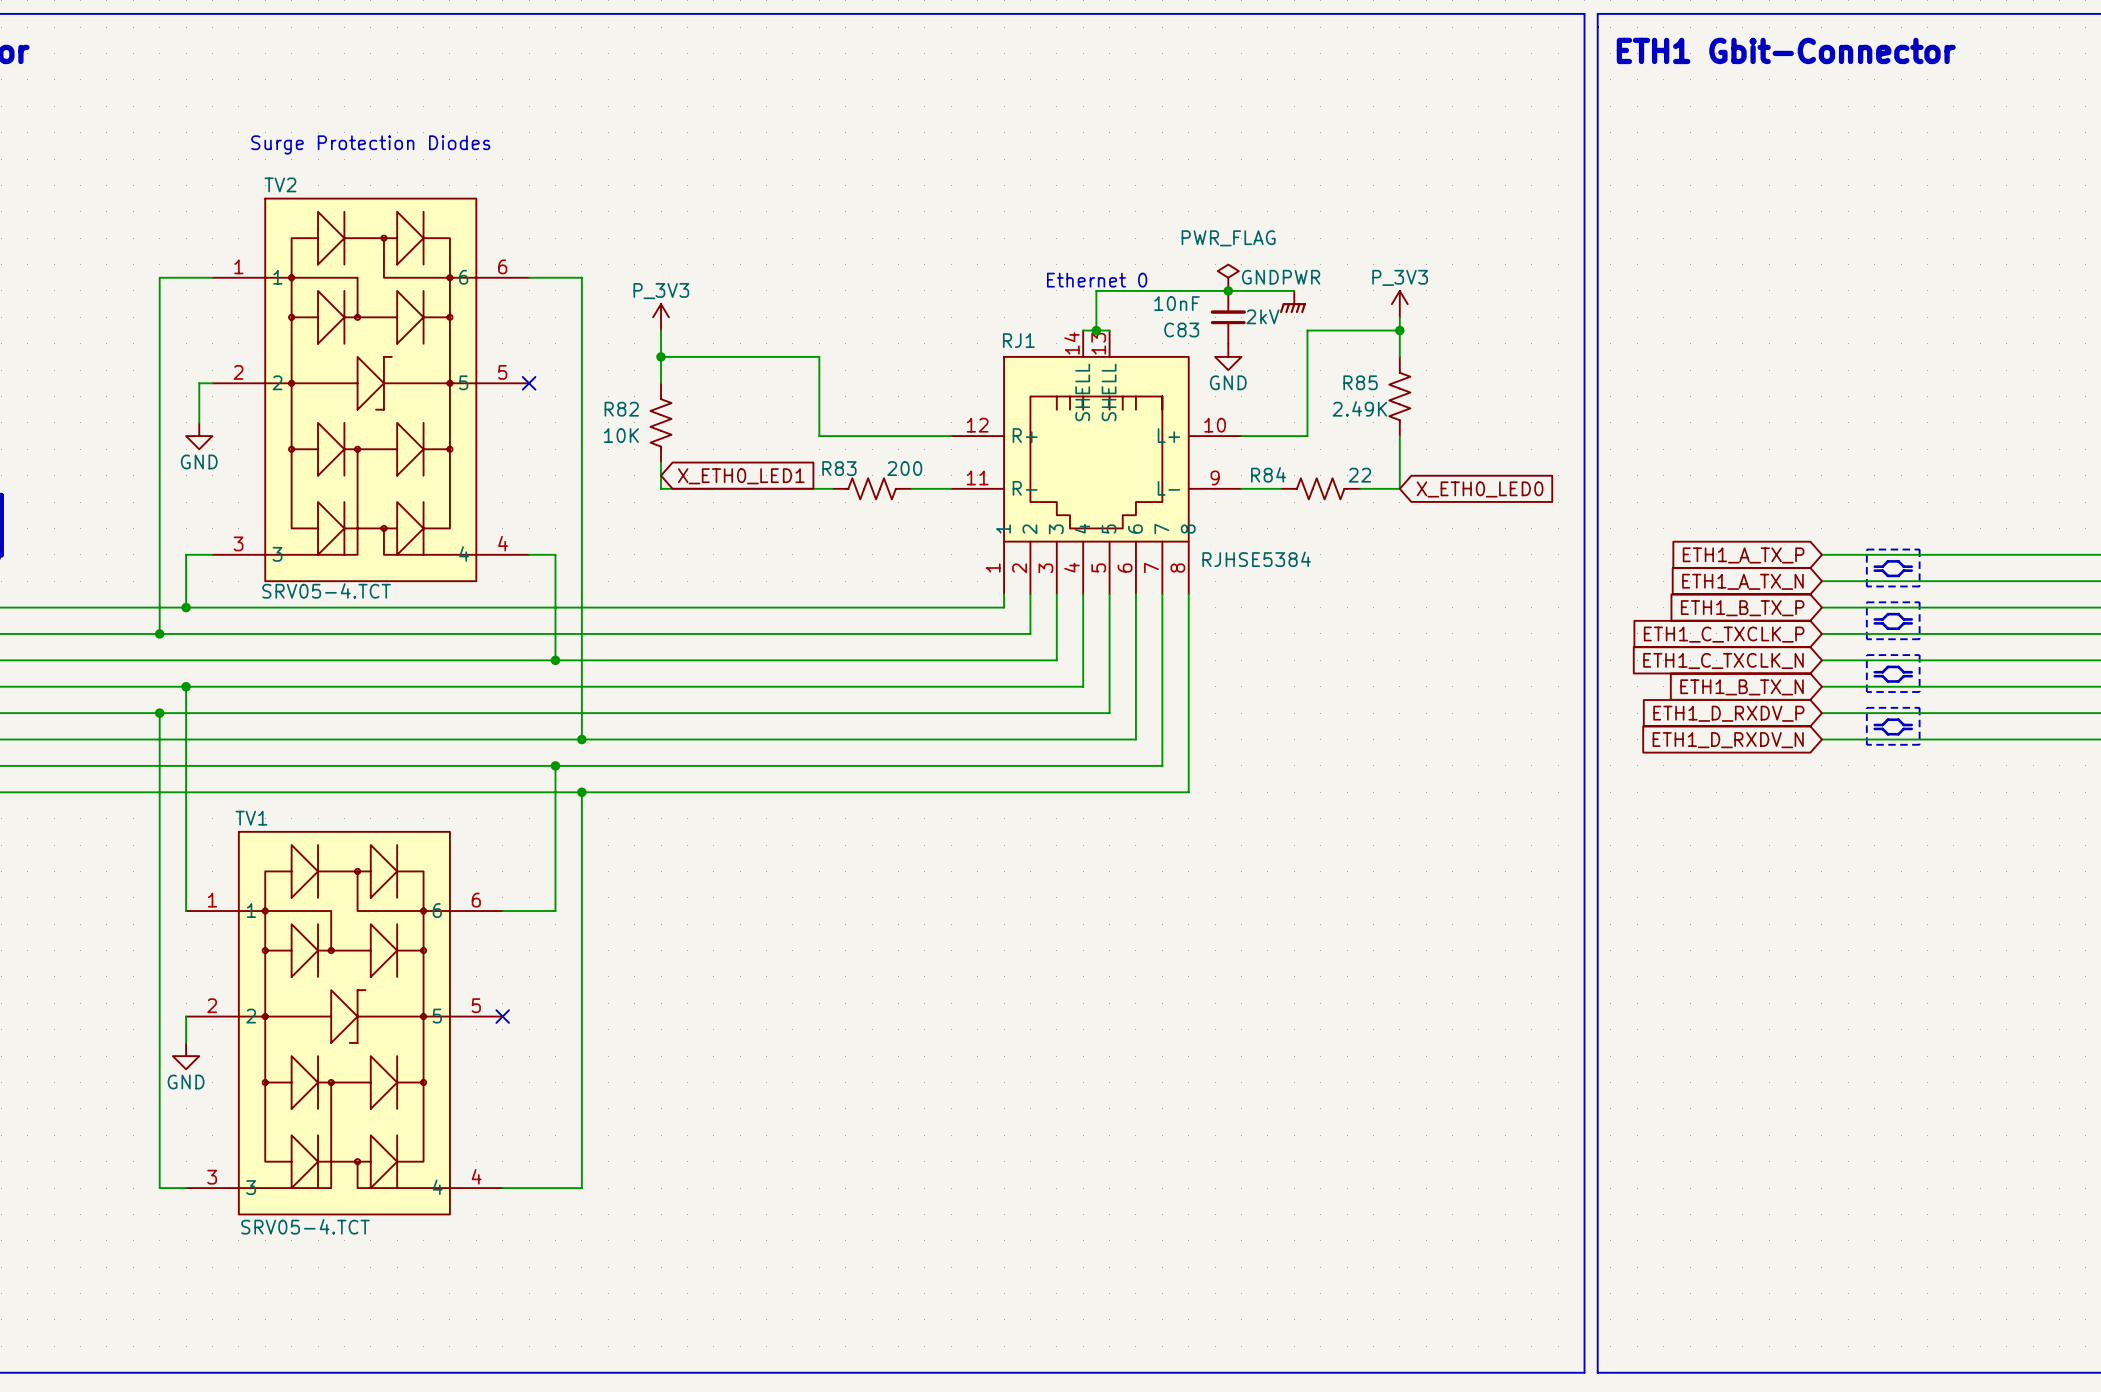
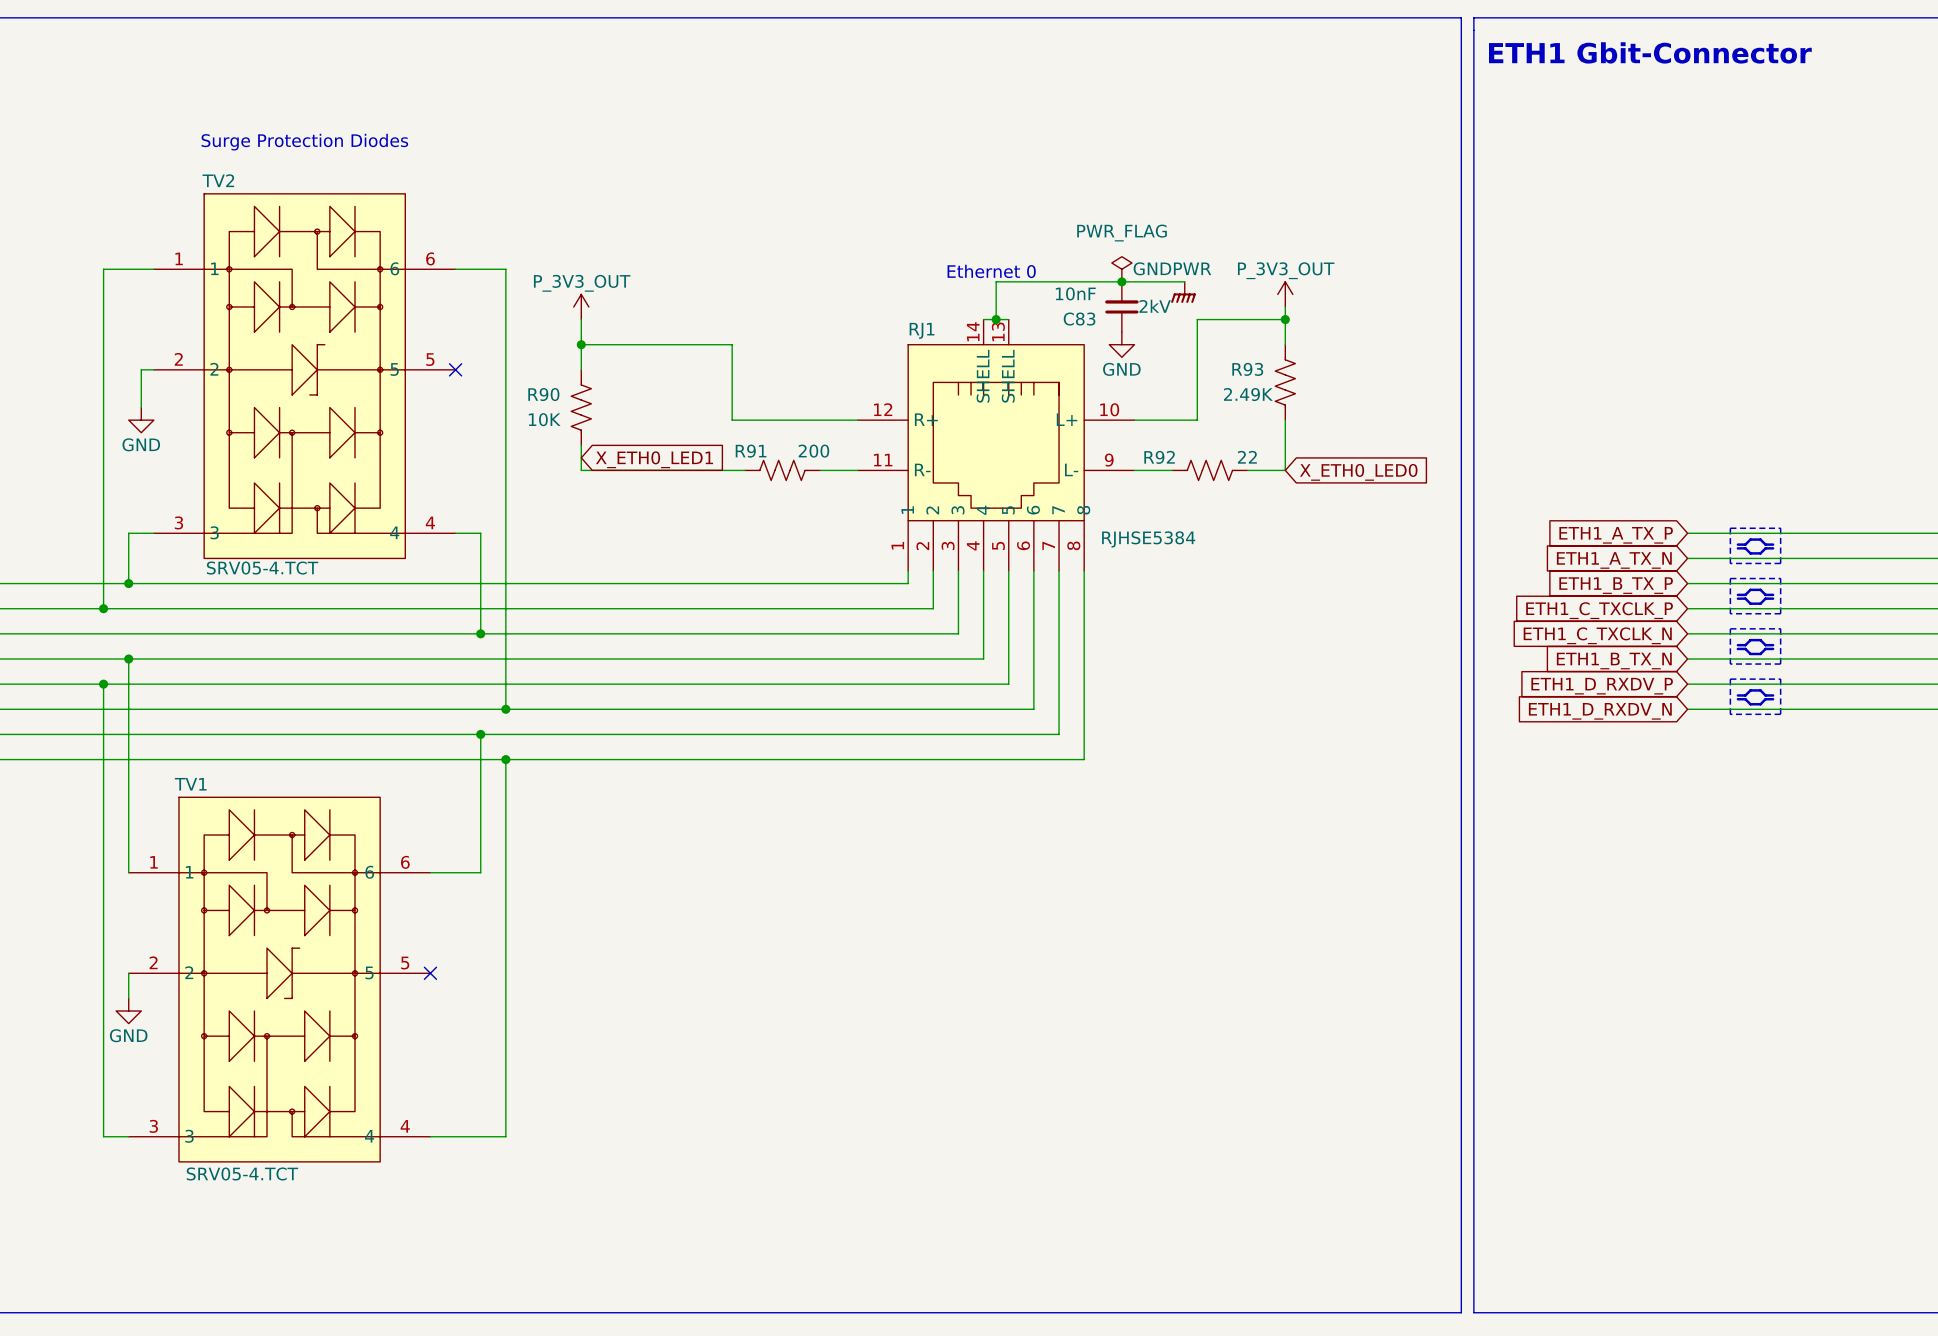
power symbol: P_3V3 (1399, 304) -> P_3V3_OUT (1285, 294)
power symbol: P_3V3 (661, 317) -> P_3V3_OUT (581, 306)
R85 name: R85 (1360, 382) -> R93 (1247, 369)
R82 name: R82 (621, 409) -> R90 (543, 394)
R83 name: R83 (839, 468) -> R91 (751, 451)
R84 name: R84 (1268, 474) -> R92 (1159, 457)

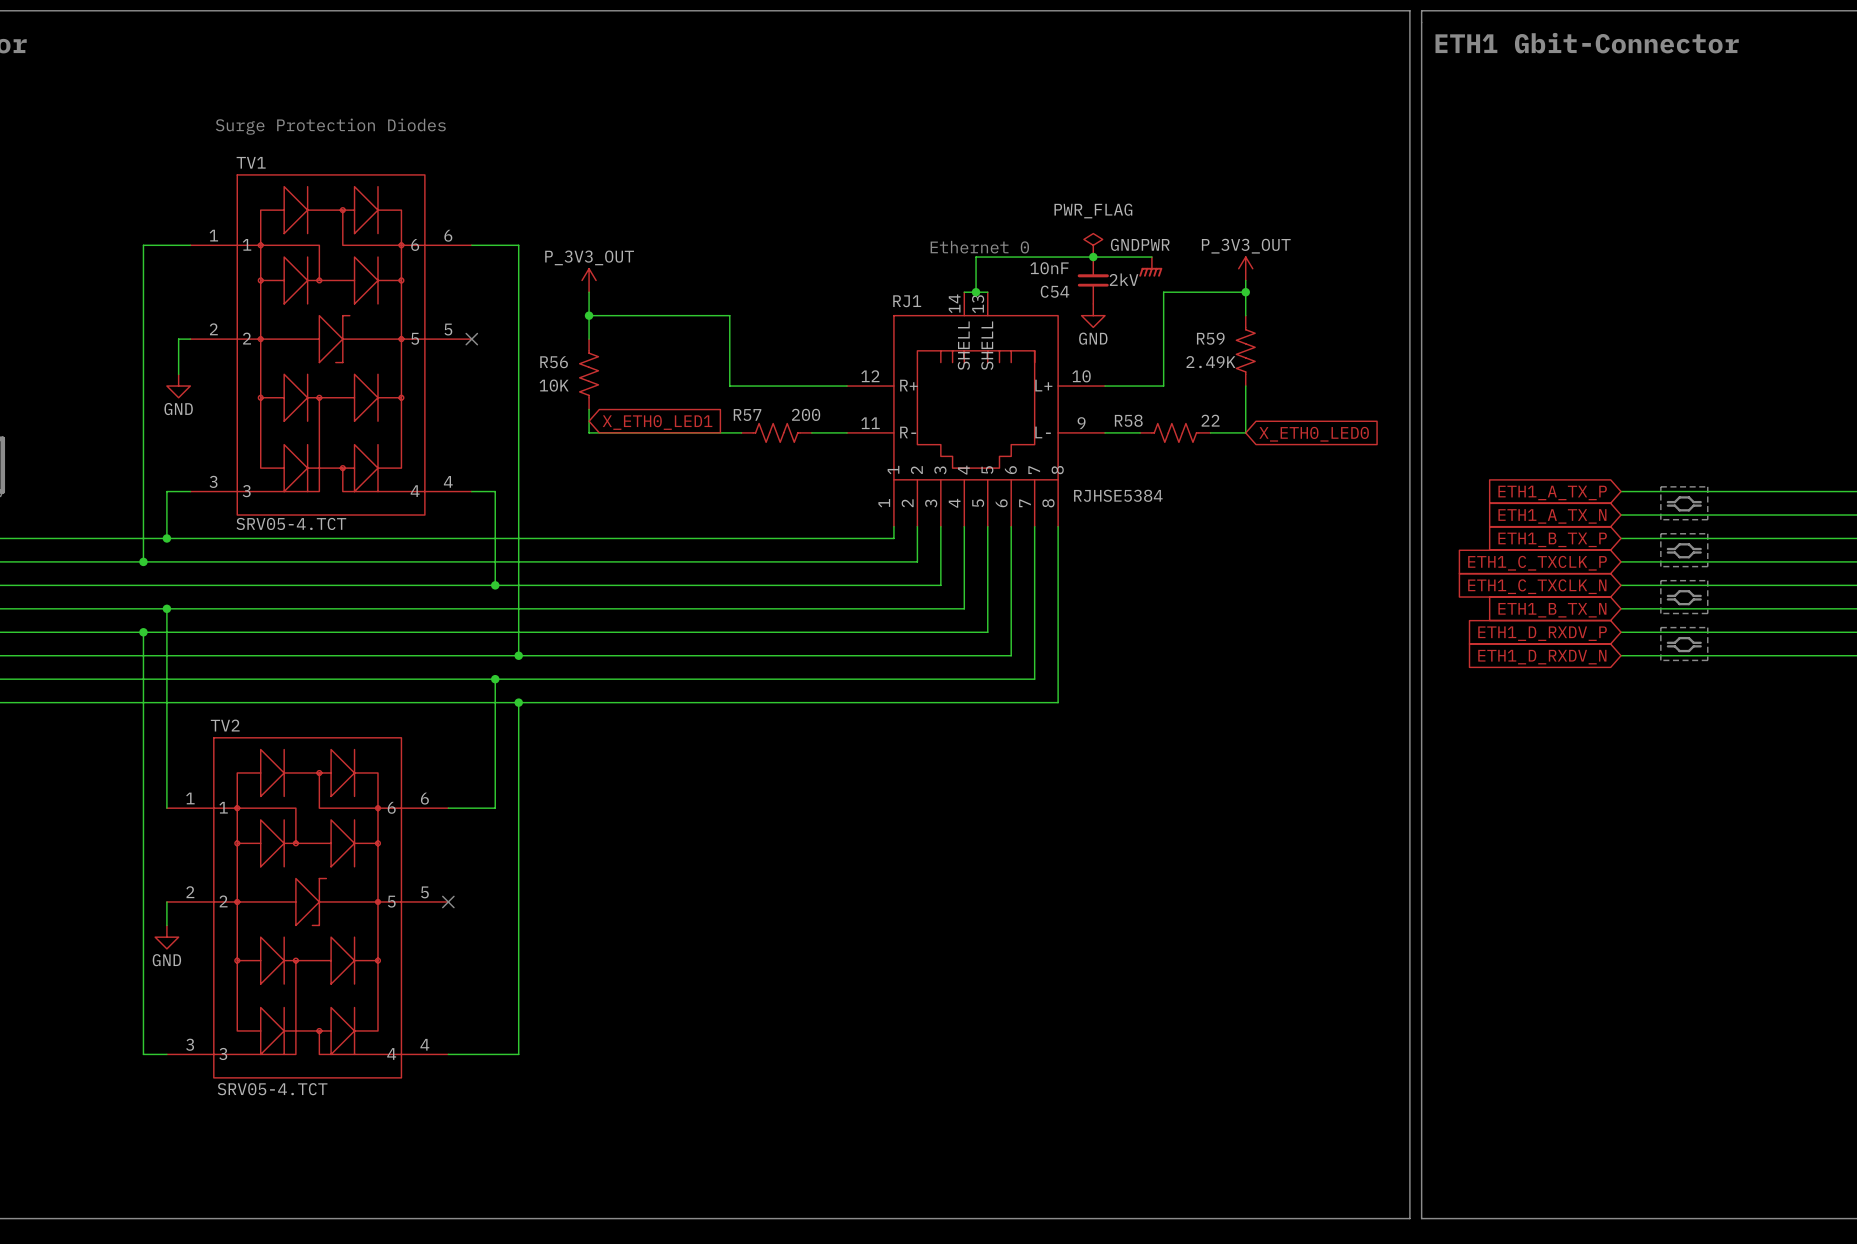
TV2 name: TV2 (218, 180) -> TV1 (251, 162)
C83 name: C83 (1079, 319) -> C54 (1054, 291)
R93 name: R93 (1247, 369) -> R59 (1210, 338)
R90 name: R90 (543, 394) -> R56 (554, 362)
R91 name: R91 (751, 451) -> R57 (747, 415)
R92 name: R92 (1159, 457) -> R58 (1128, 420)
TV1 name: TV1 (190, 784) -> TV2 (225, 725)

